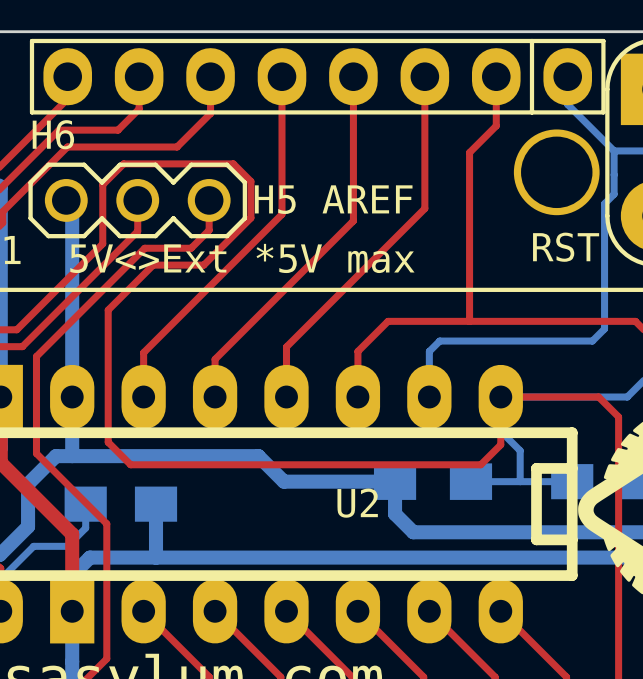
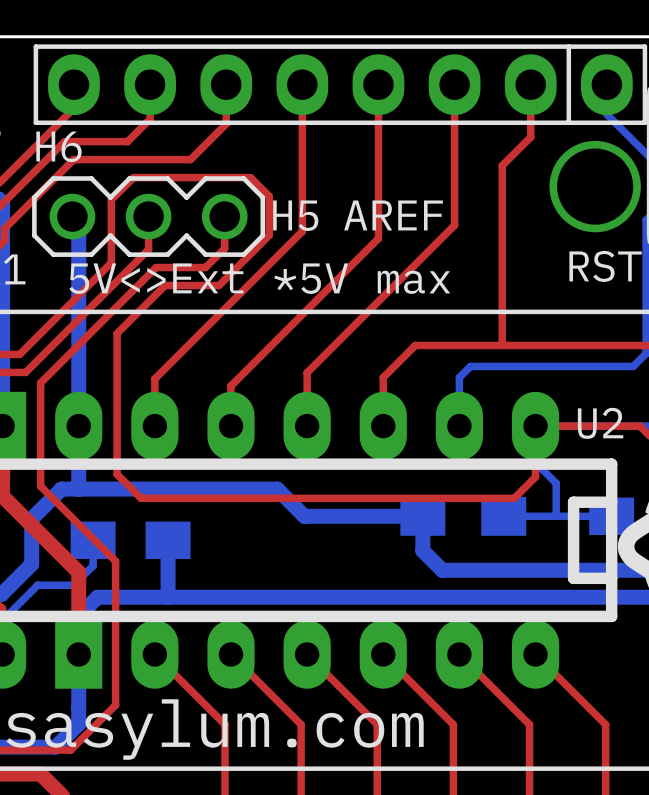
U2 name position: U2 (357, 503) -> U2 (600, 423)

